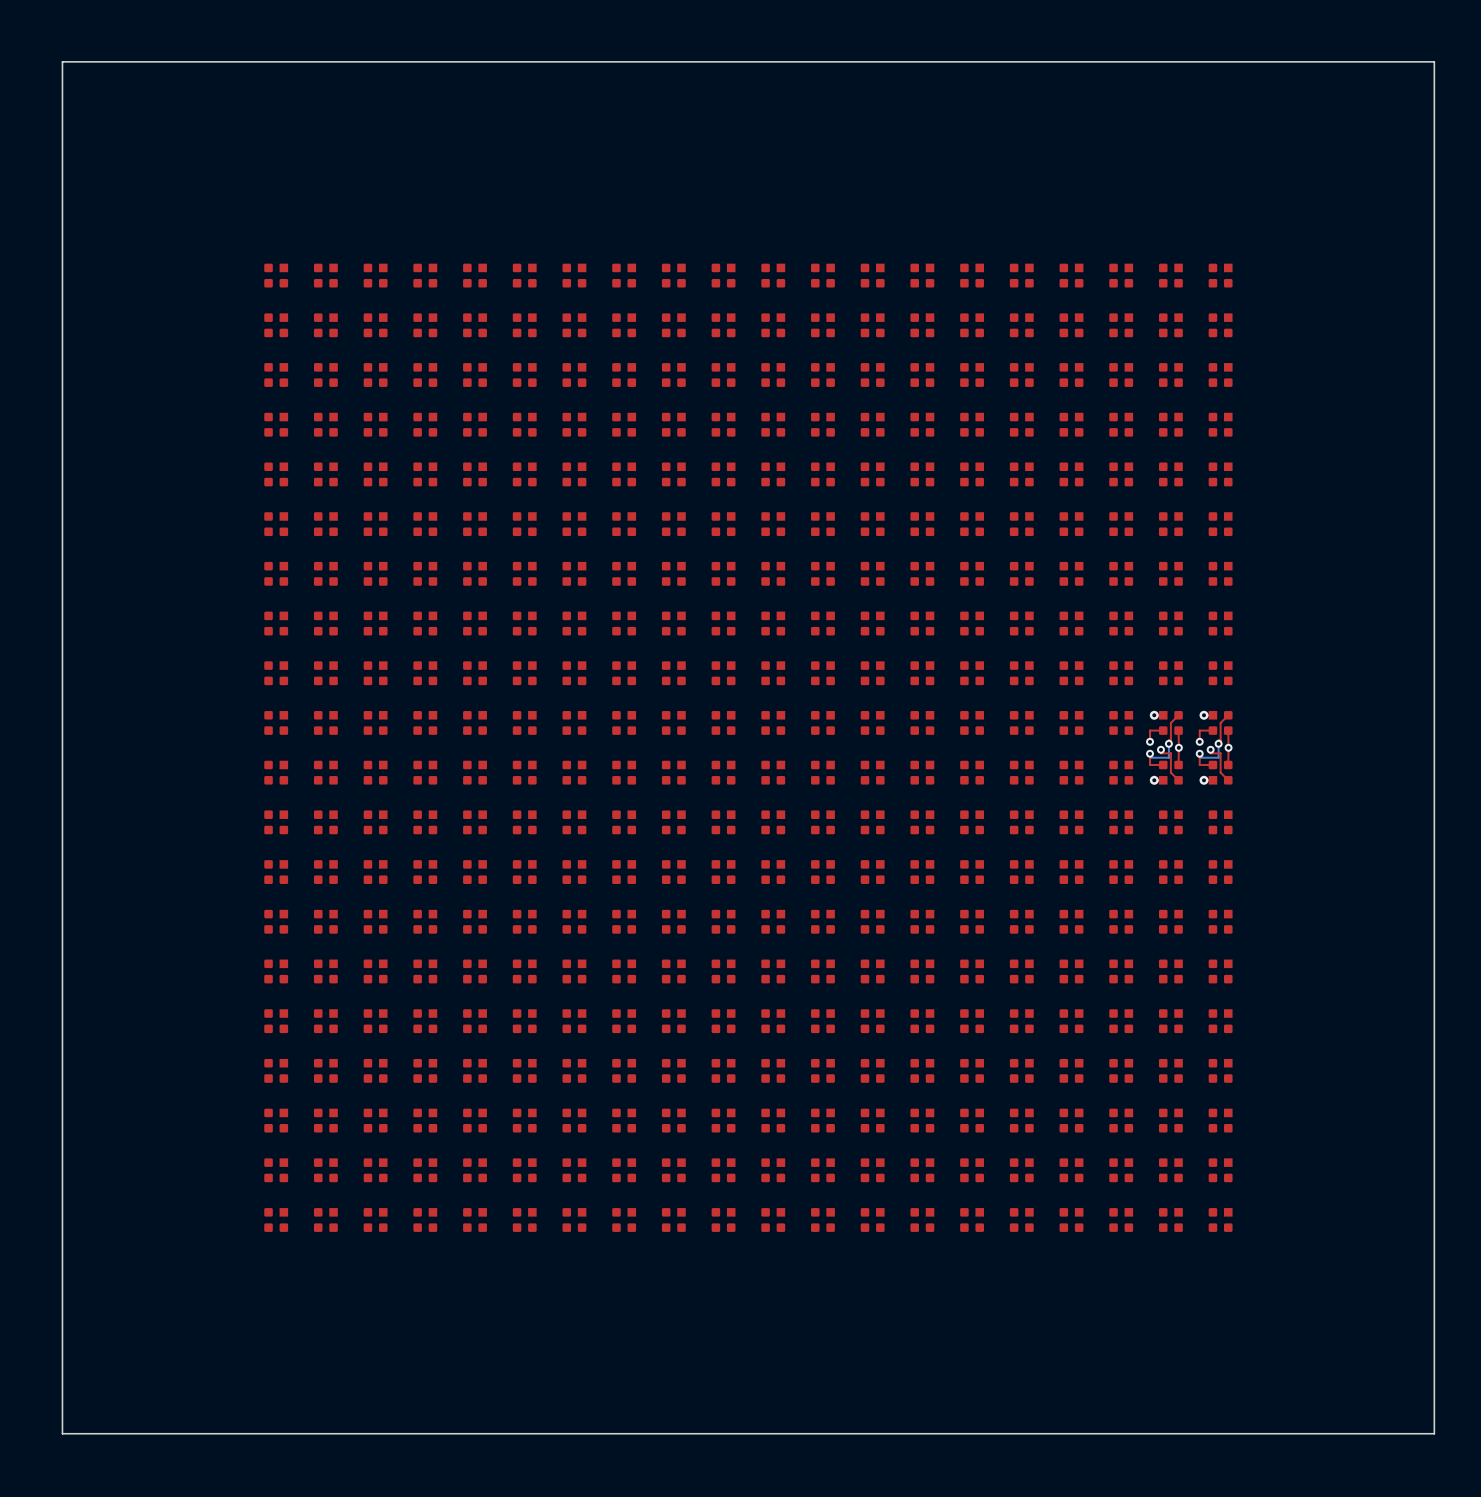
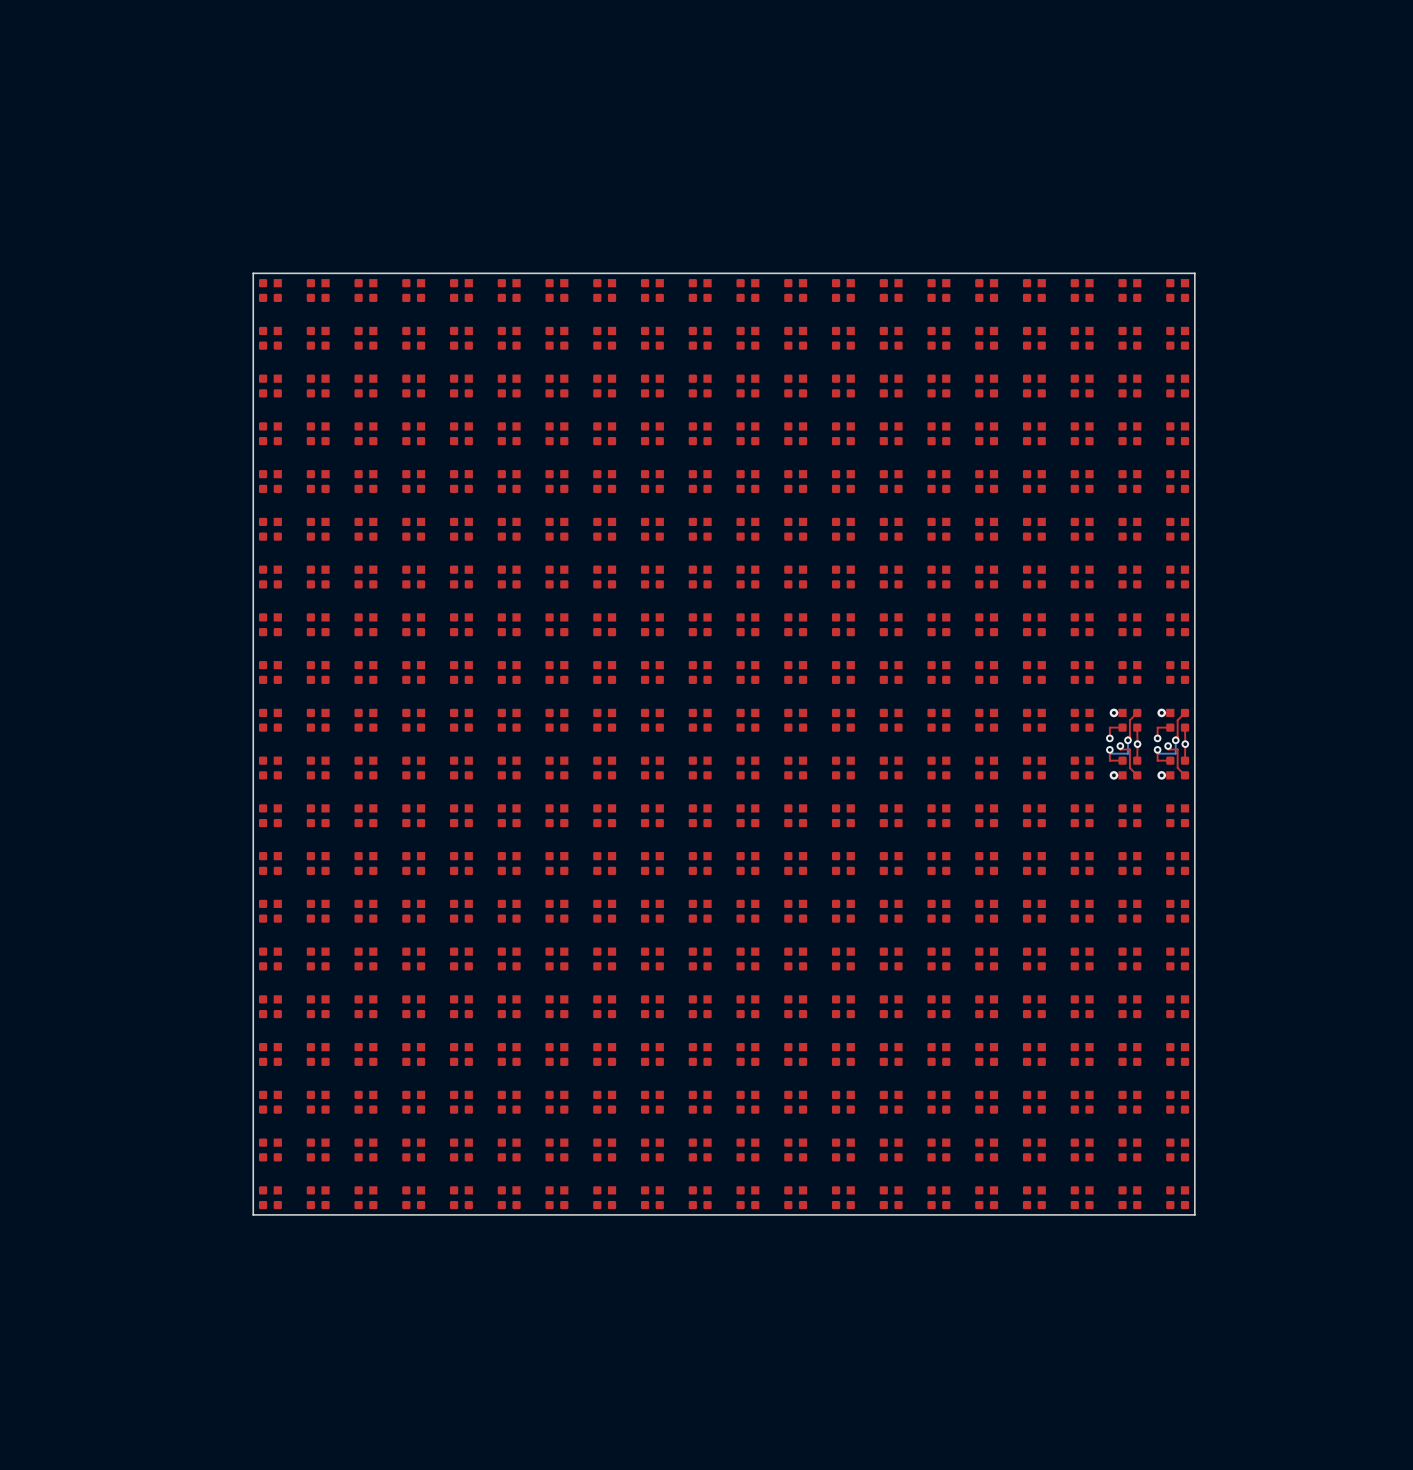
board edge: (62, 61) (1434, 61) (1434, 1433) (62, 1433) (62, 61) -> (253, 273) (253, 1214) (1194, 1214) (1194, 273) (253, 273)

